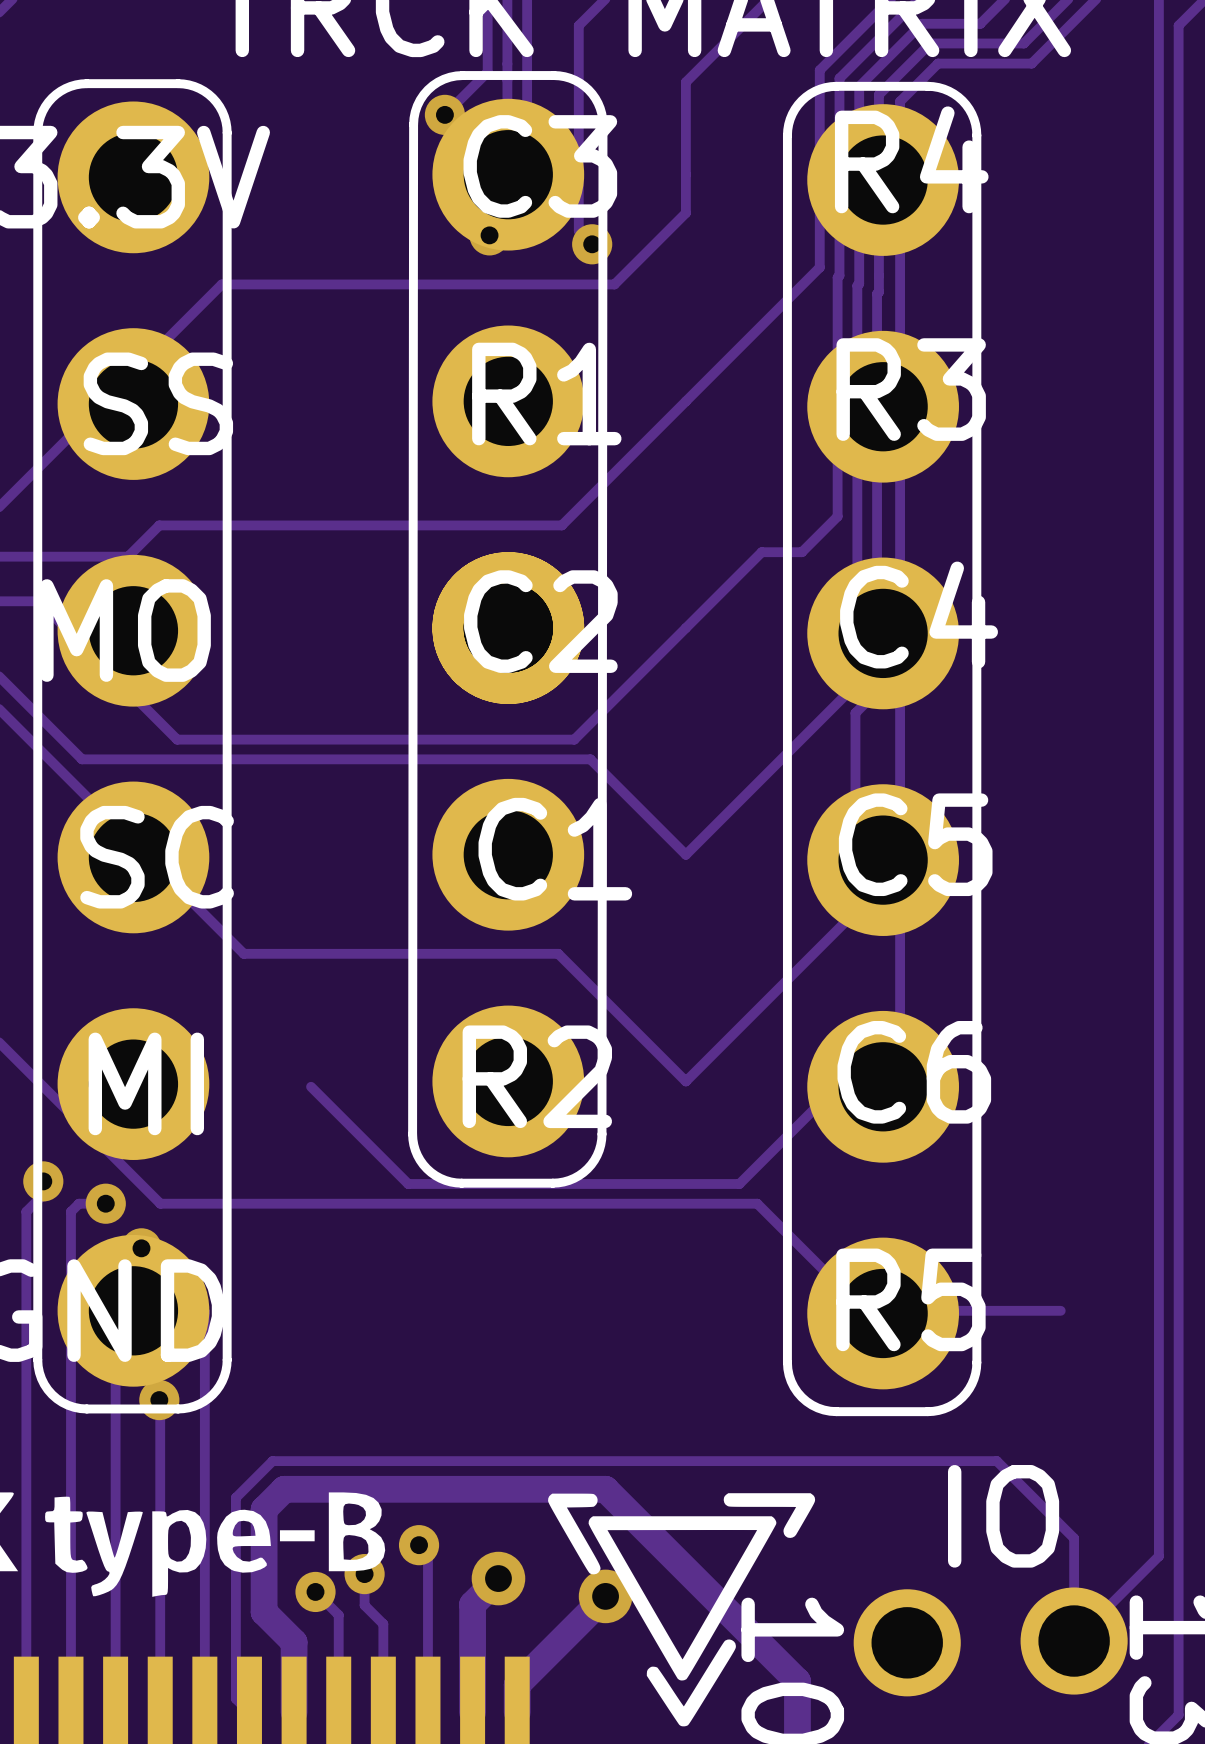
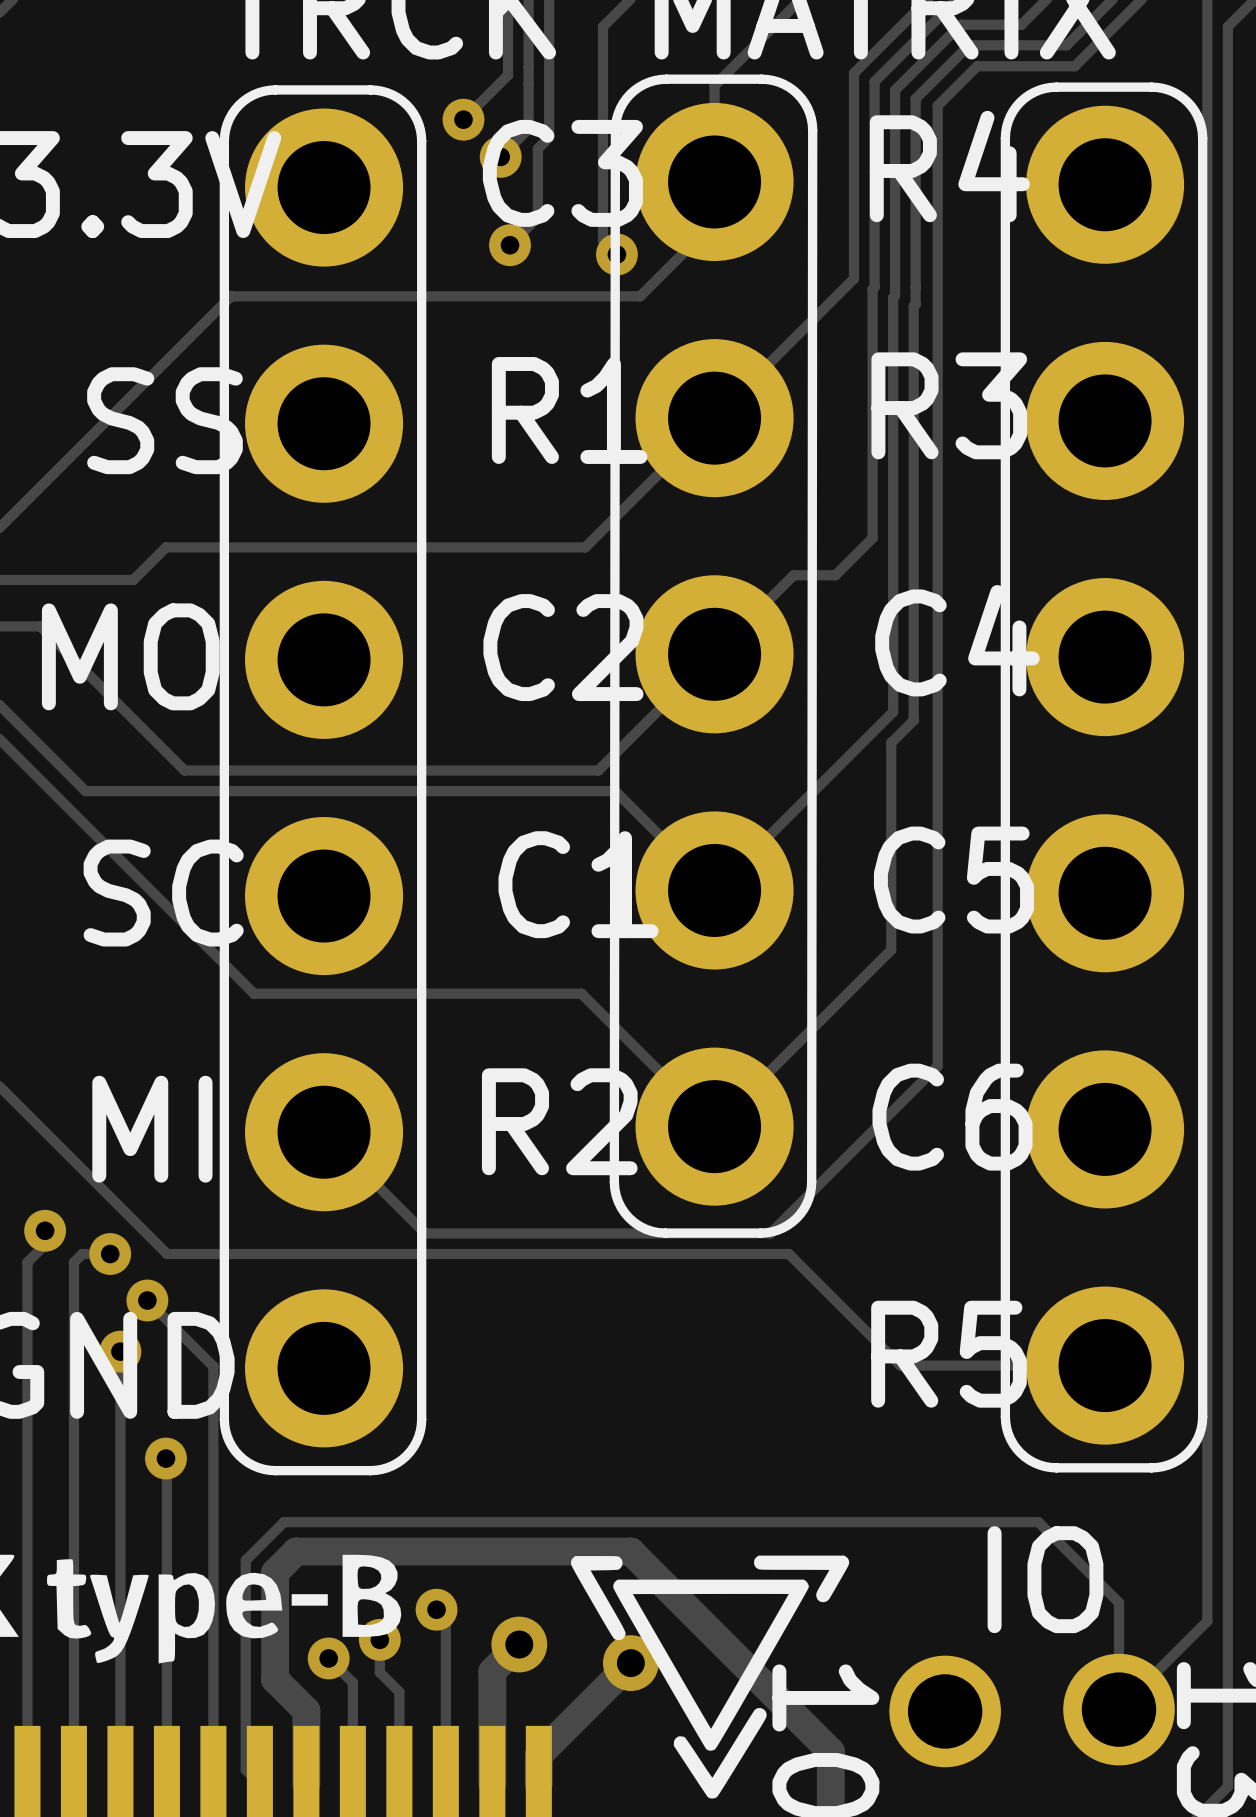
part: (508, 628) -> none
part: (507, 629) -> none
part: none -> (713, 656)
part: (132, 746) -> none
part: none -> (1104, 777)
part: none -> (323, 780)
part: (882, 748) -> none

